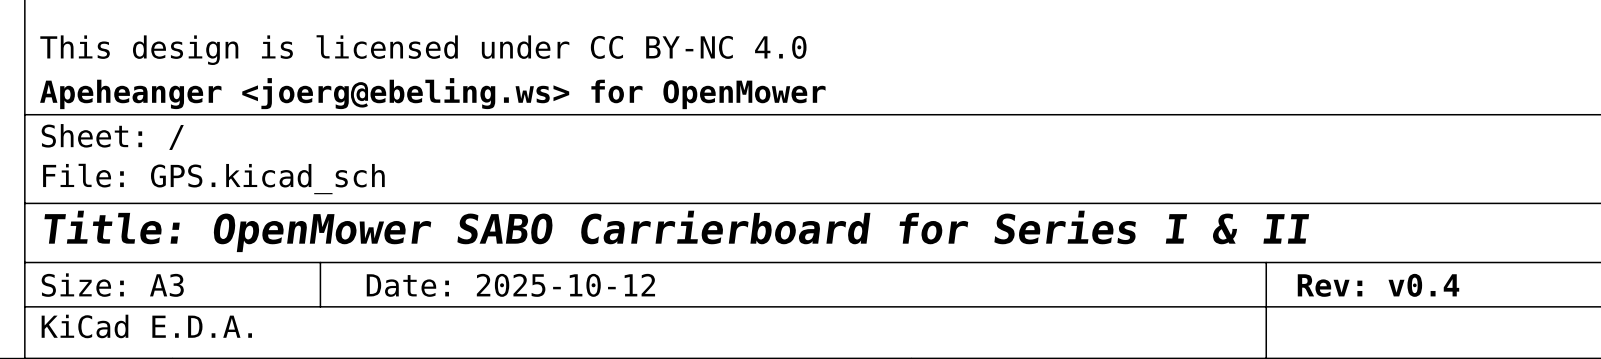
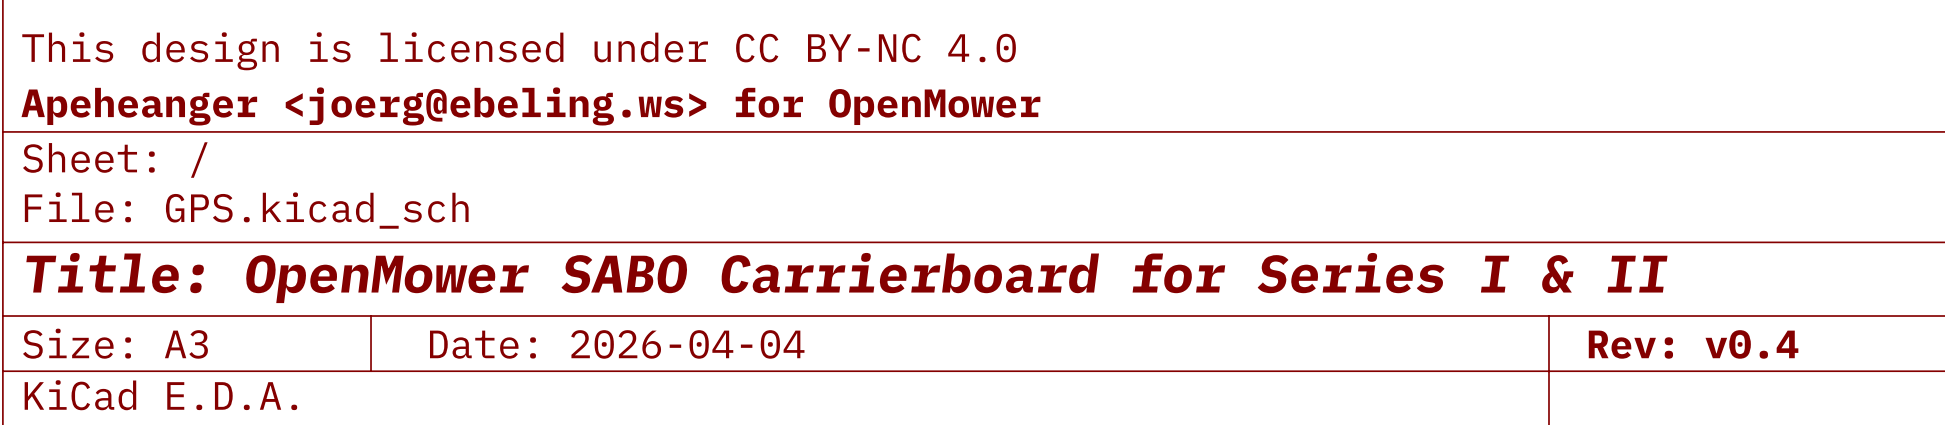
title block: Date: 2025-10-12 (510, 285) -> Date: 2026-04-04 (617, 344)

